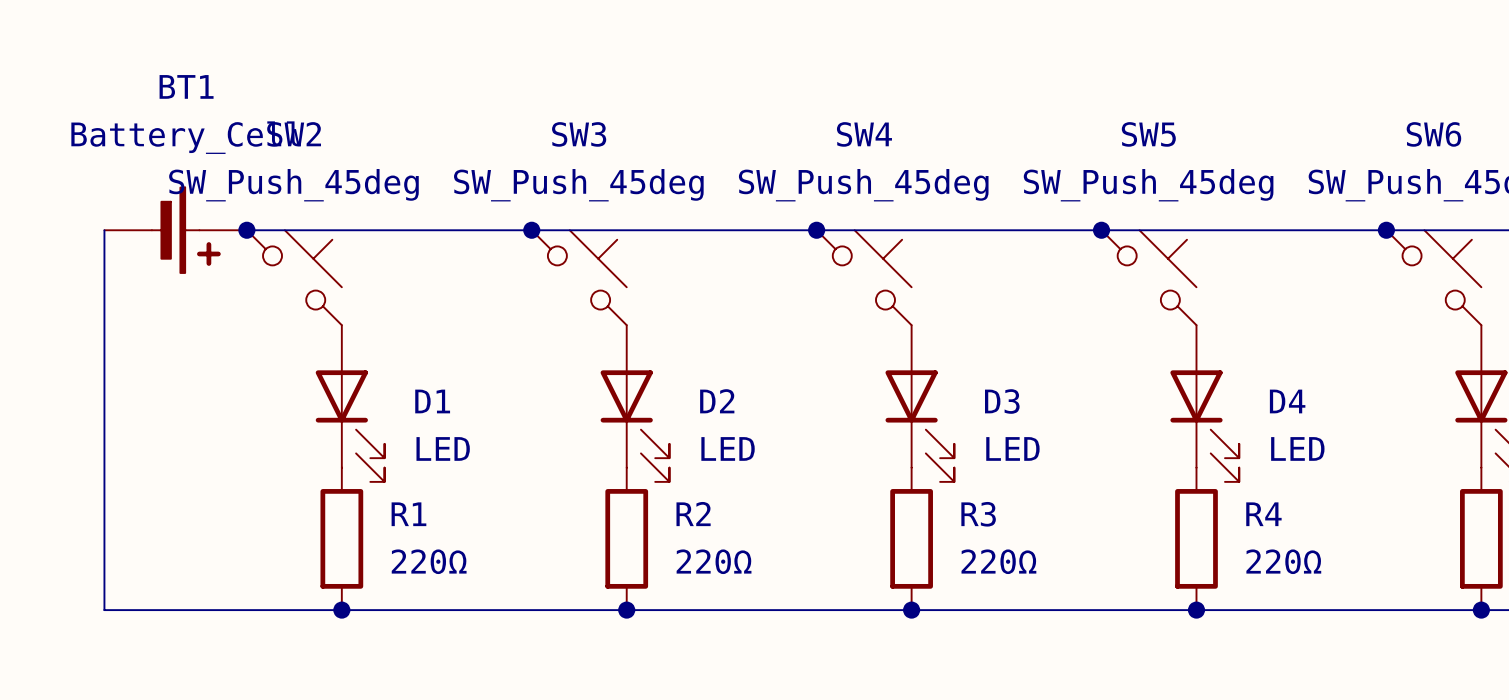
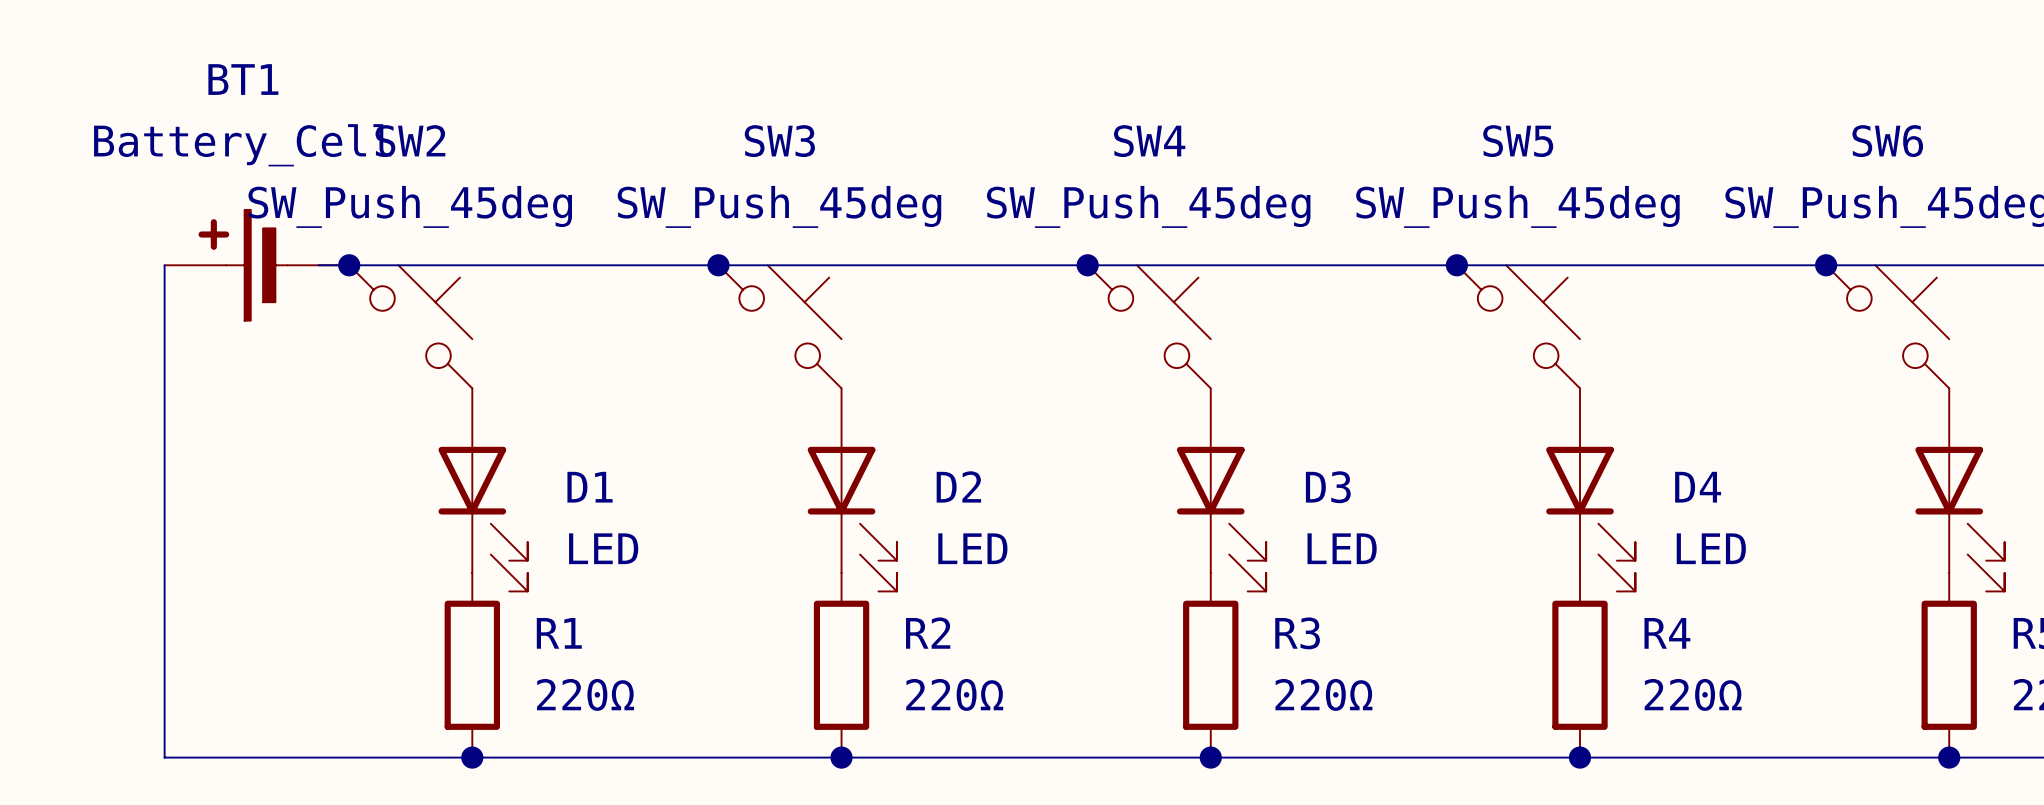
BT1 rotation: 0° (186, 230) -> 180° (243, 265)

